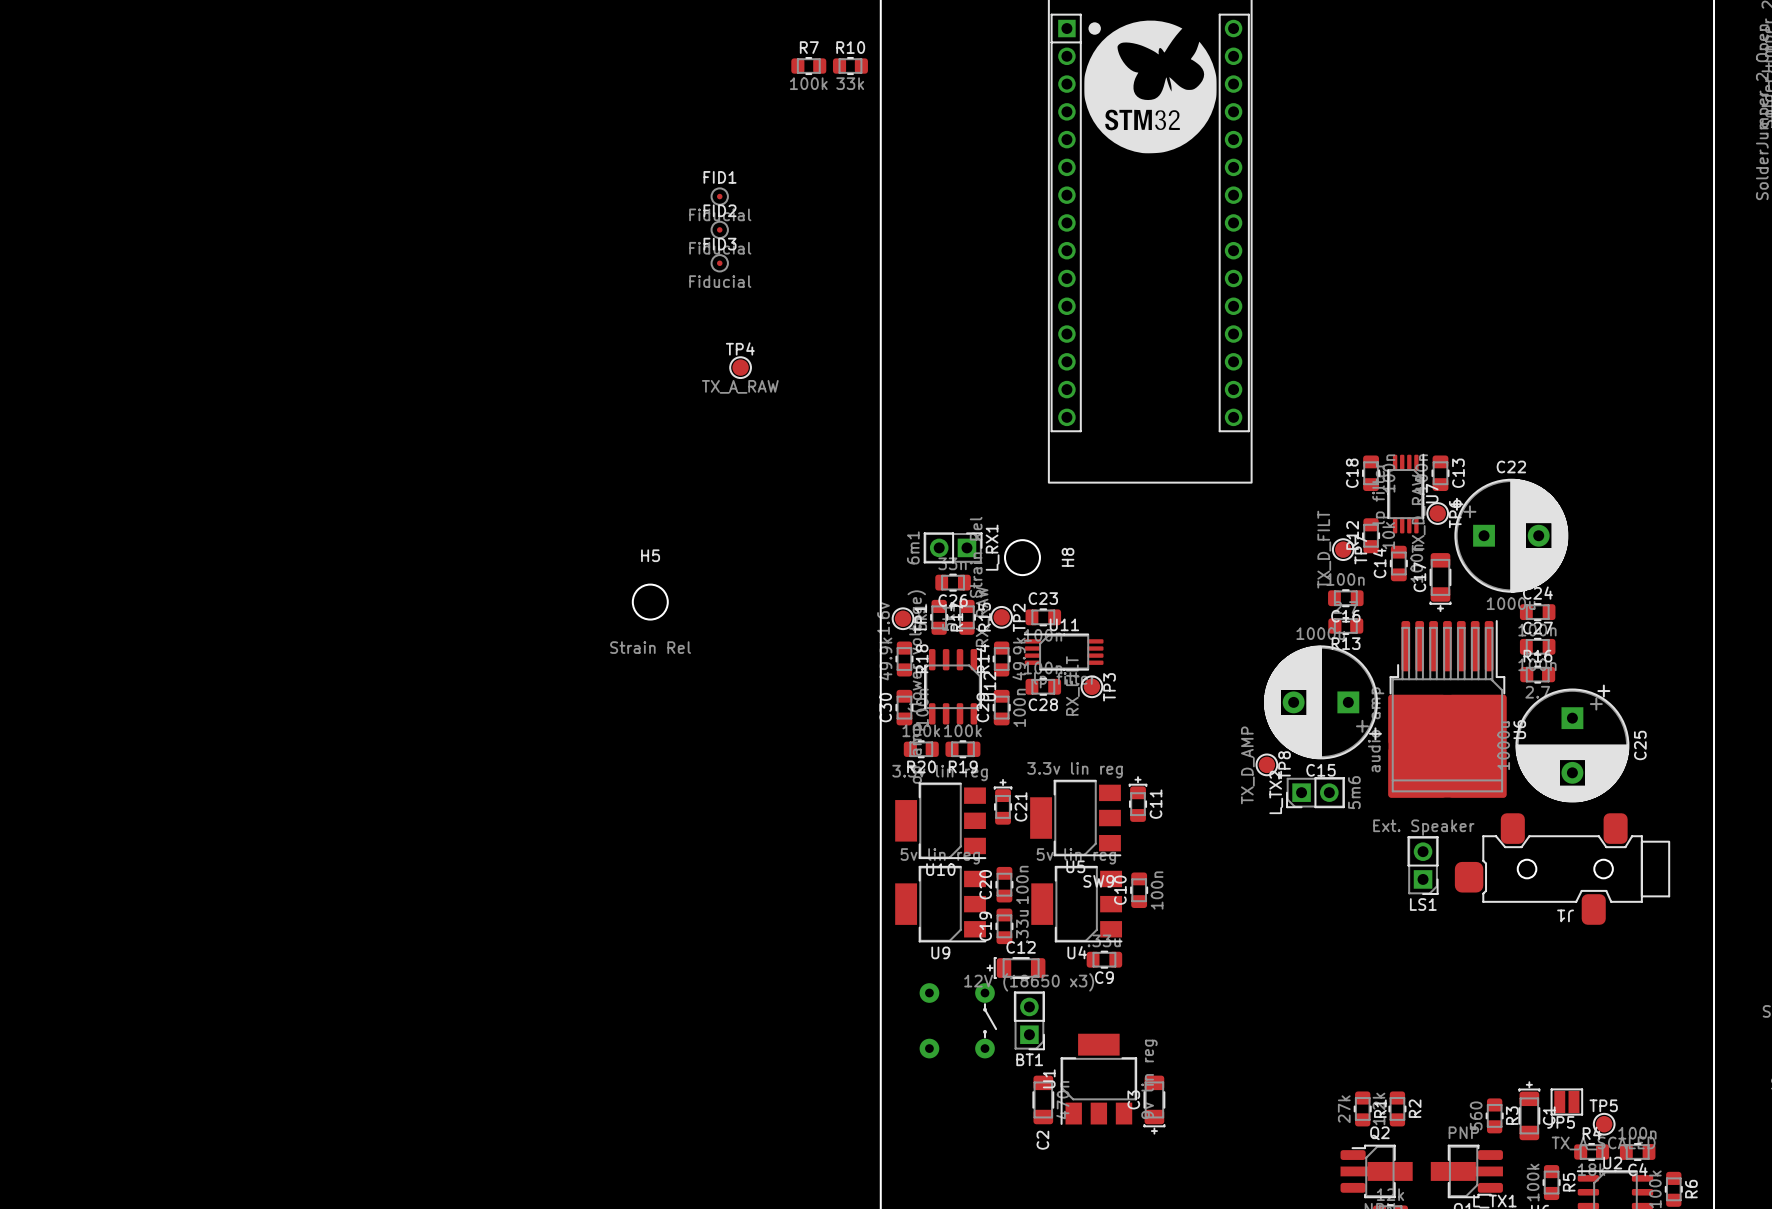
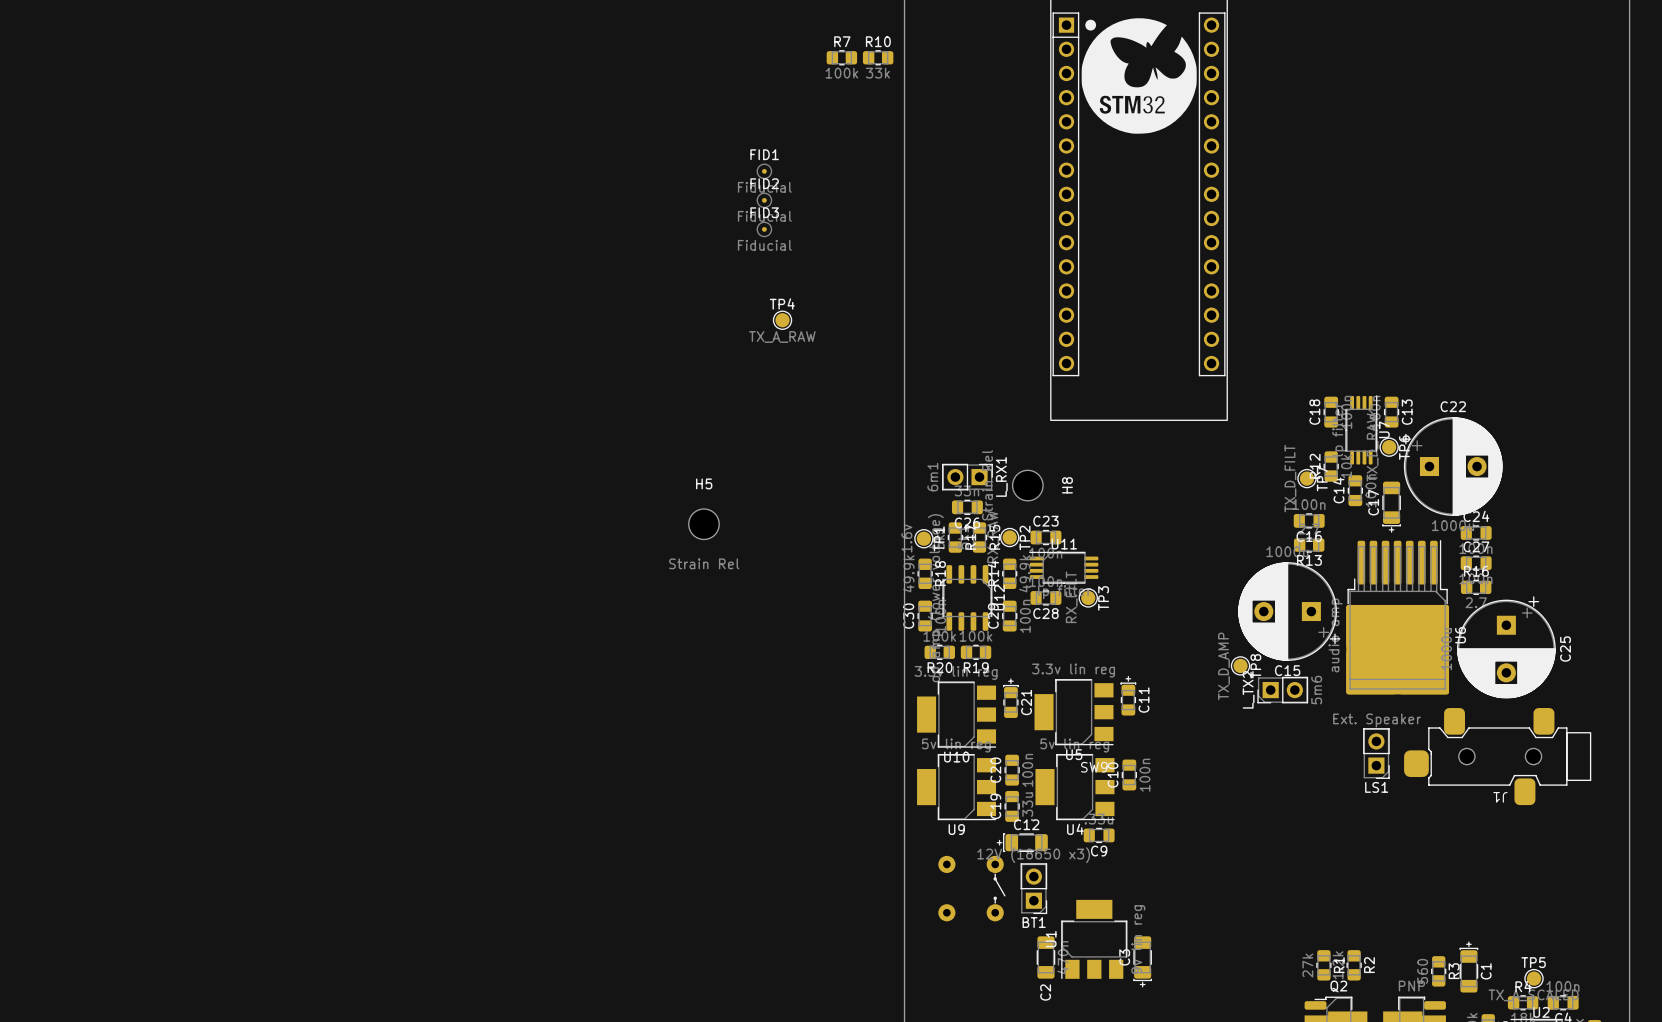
JP5: (1566, 1102) -> none

